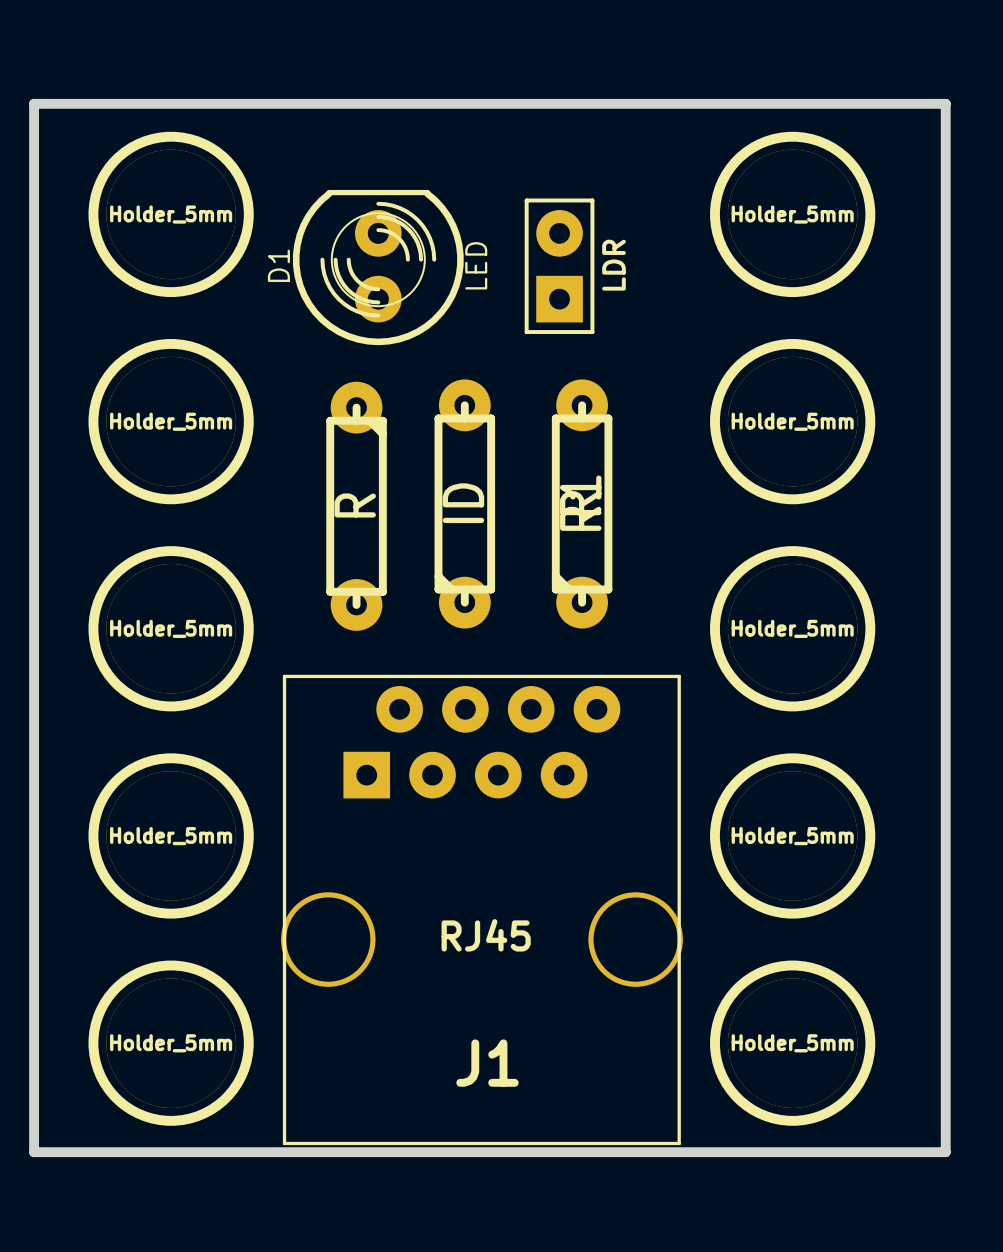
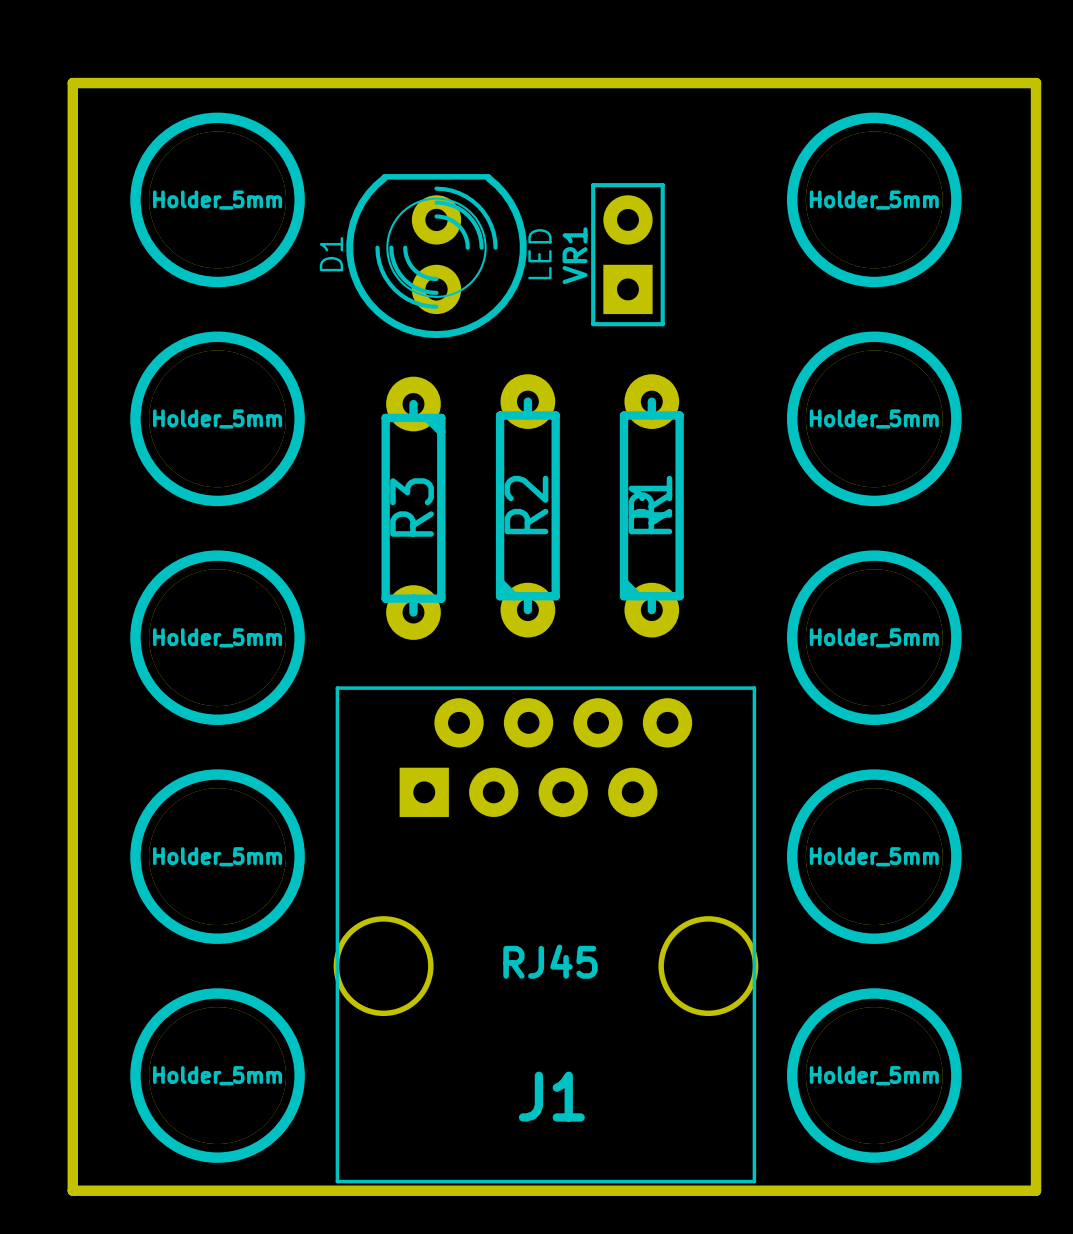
VR1 value: LDR (613, 265) -> none
VR1 name: none -> VR1 (575, 255)
R2 name: none -> R2 (526, 505)
R2 value: ID (463, 503) -> none
R3 name: none -> R3 (412, 507)
R3 value: R (355, 505) -> none

